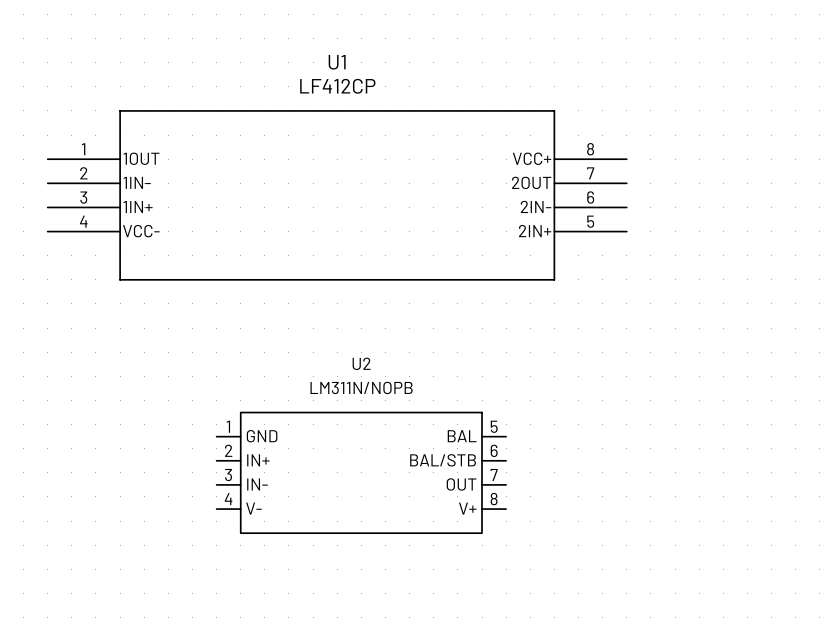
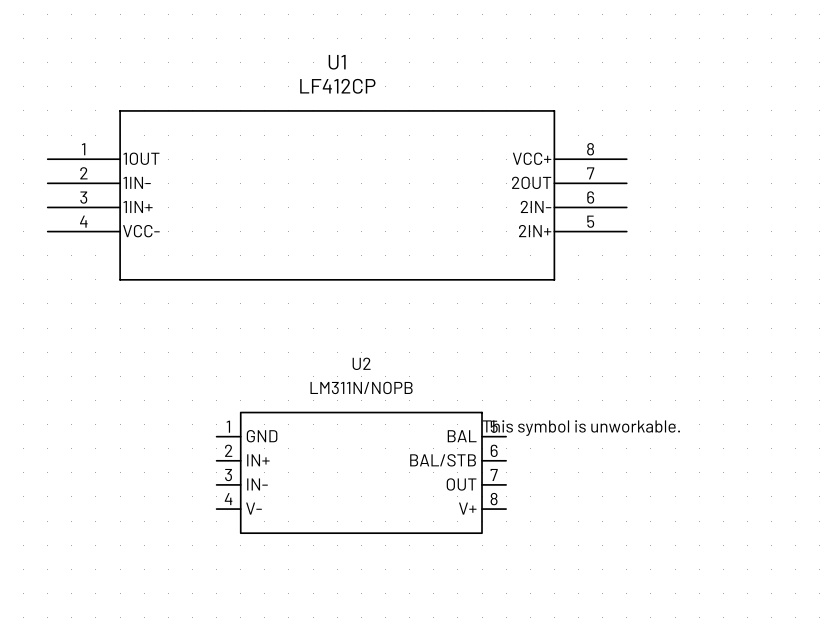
text: none -> This symbol is unworkable. (581, 428)

